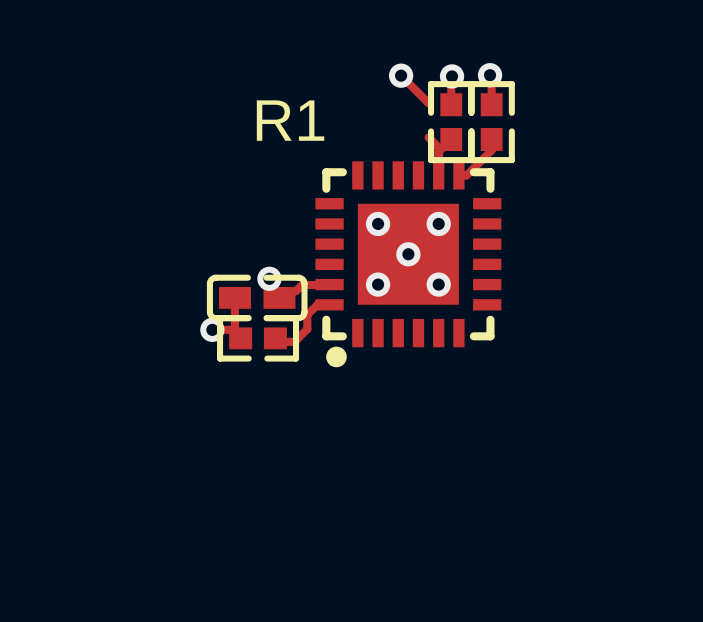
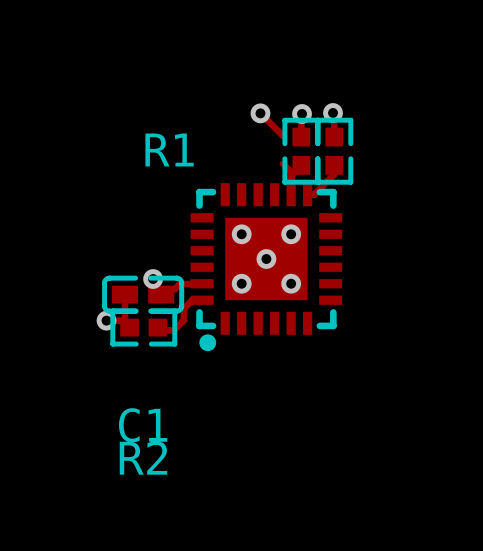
C1 name: none -> C1 (143, 425)
R2 name: none -> R2 (143, 457)

